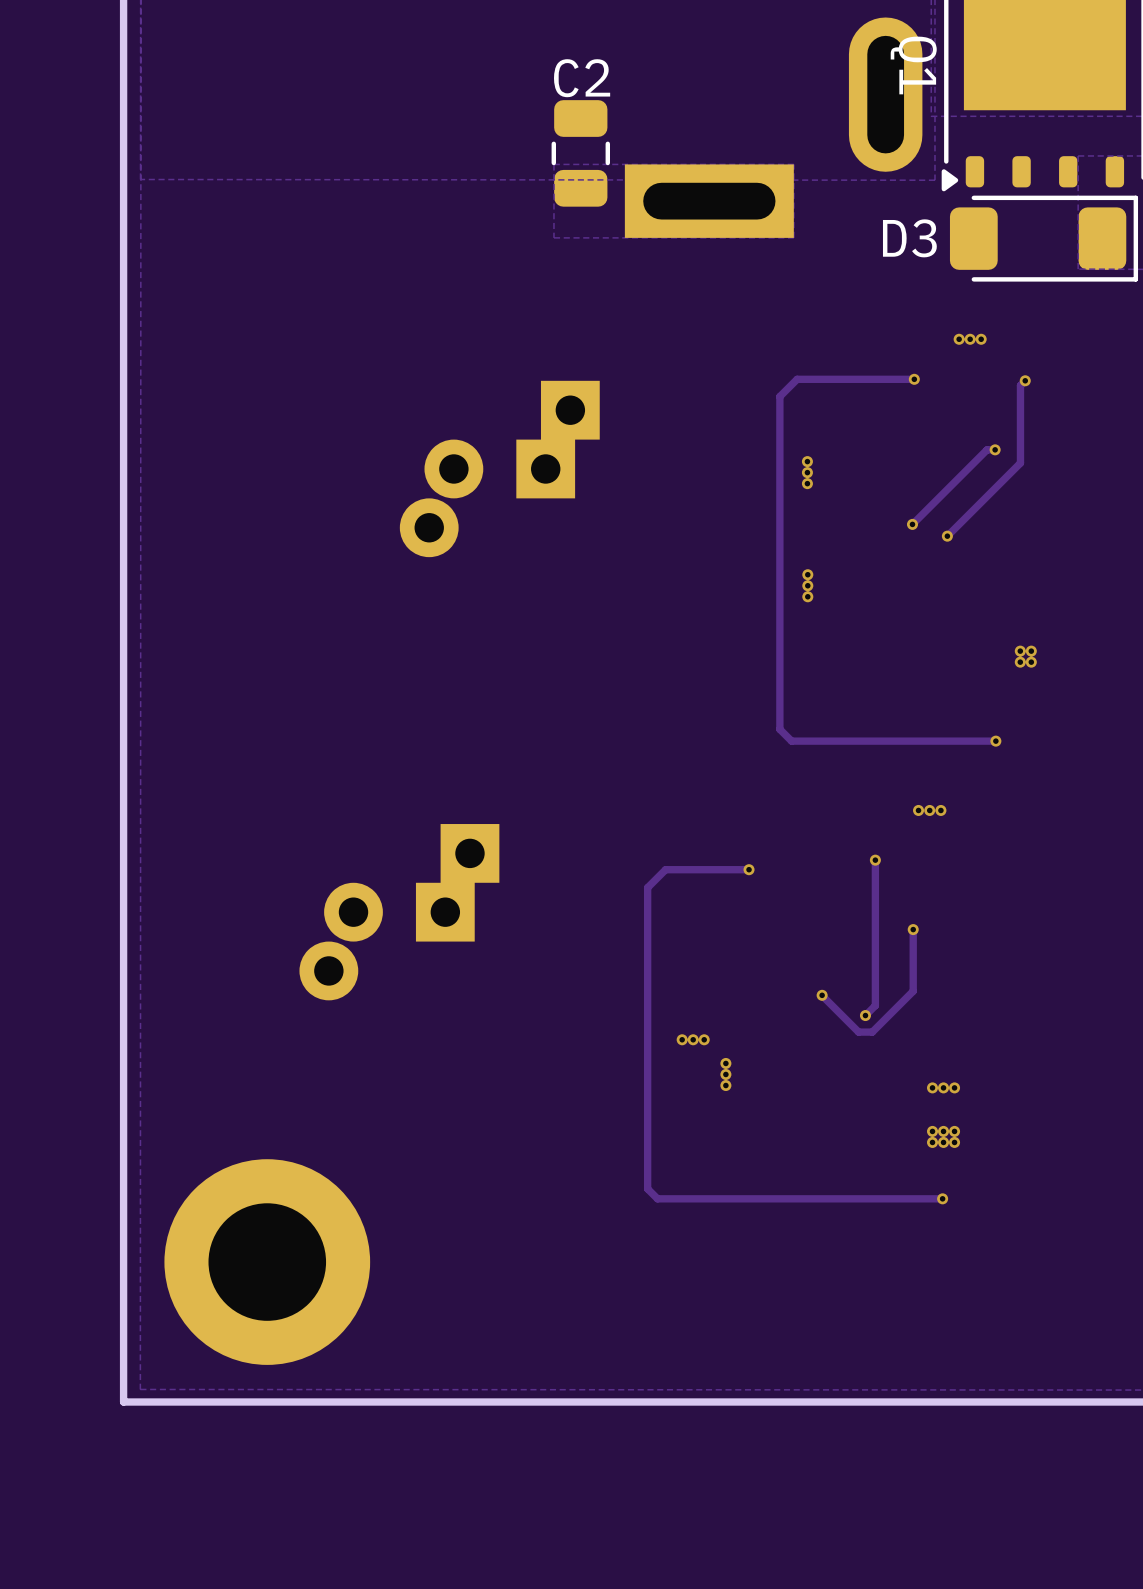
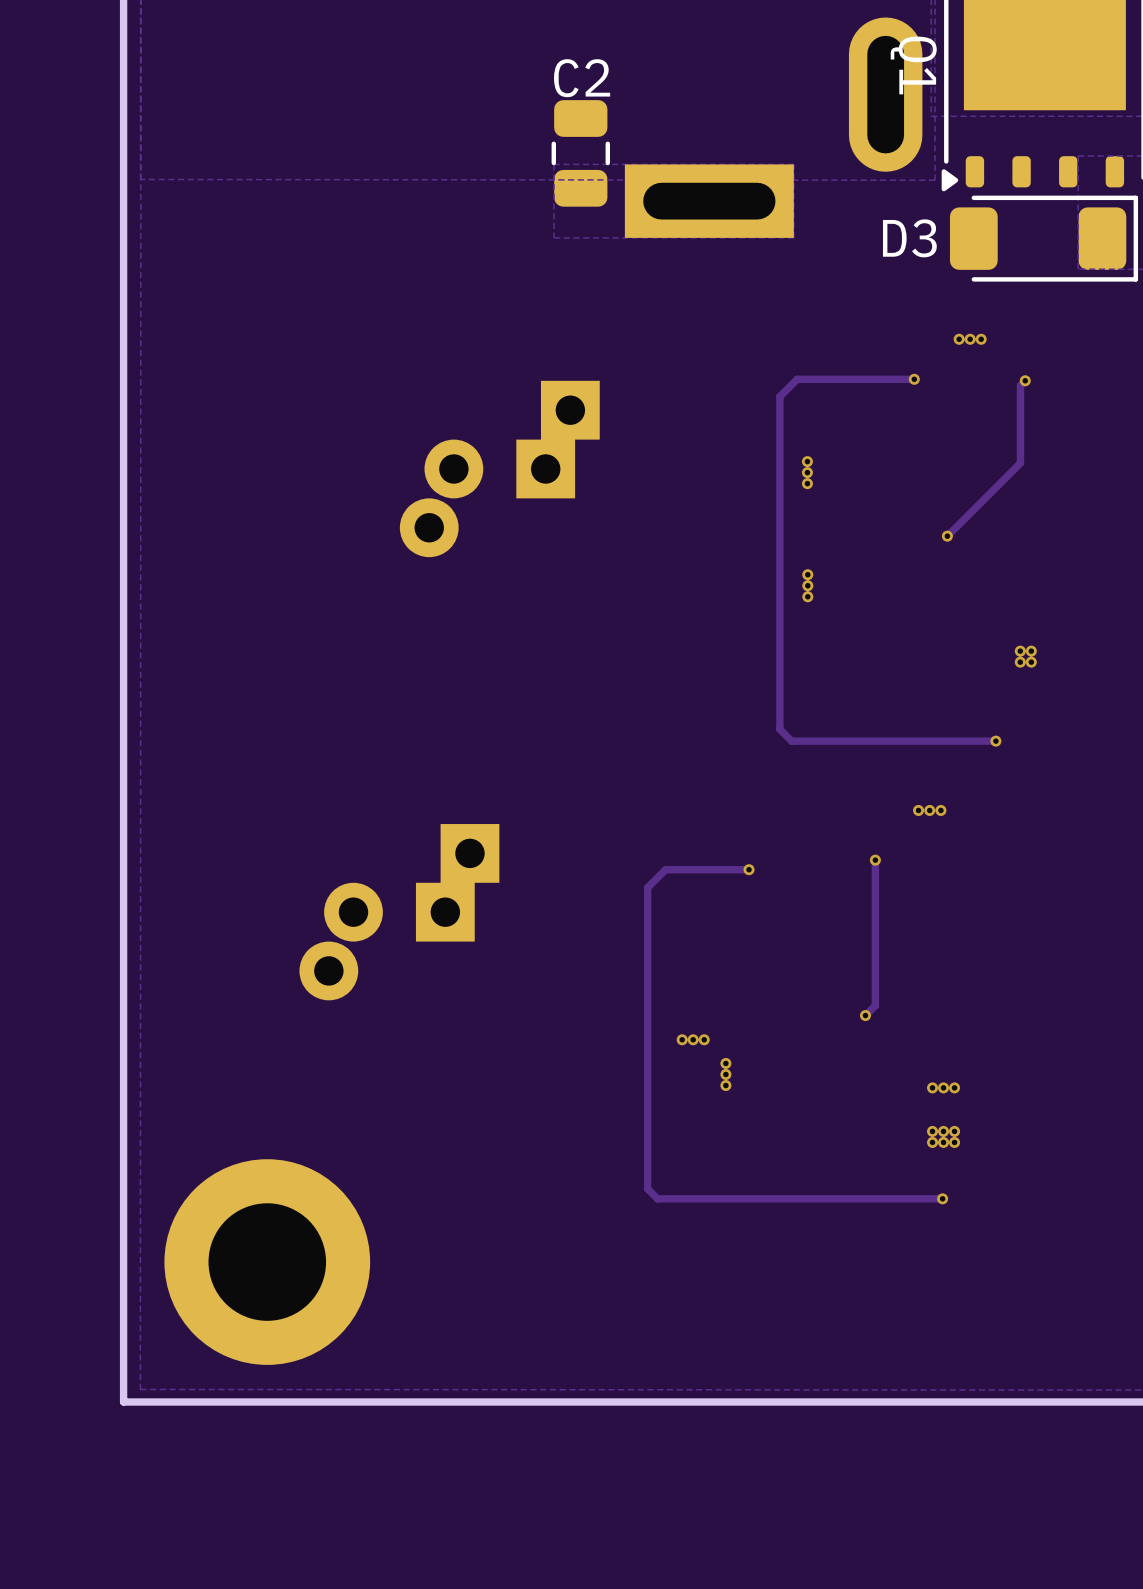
track: (995, 449) (987, 449) (912, 524) -> none
via: (995, 449) -> none
via: (912, 524) -> none
track: (913, 929) (913, 991) (872, 1032) (858, 1032) (822, 995) -> none
via: (913, 929) -> none
via: (822, 995) -> none

